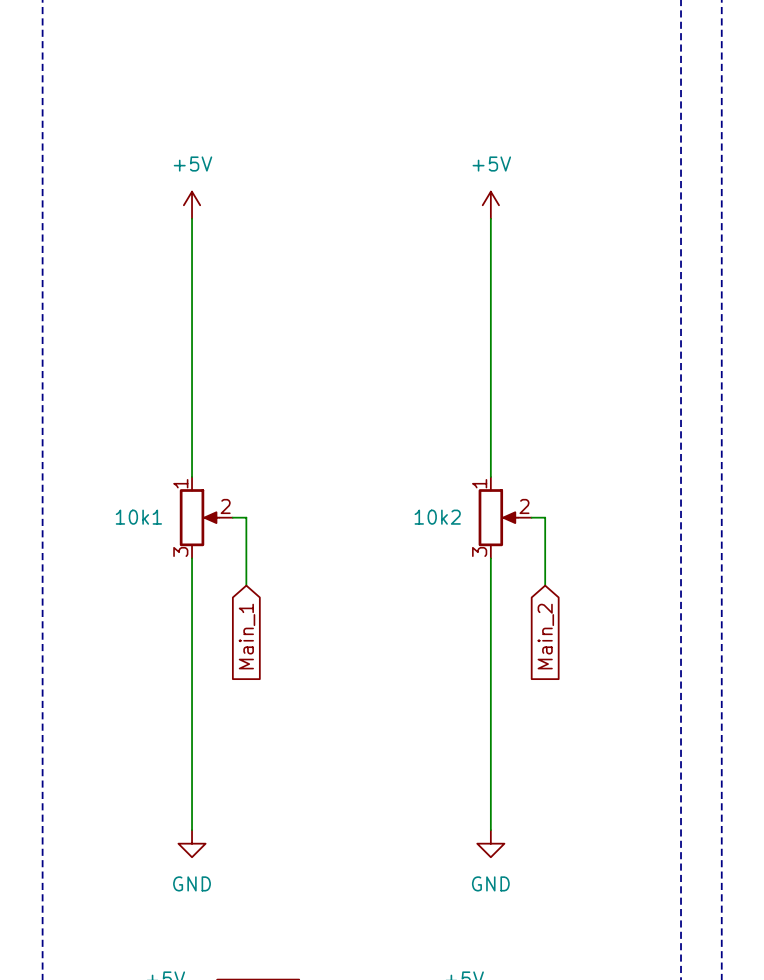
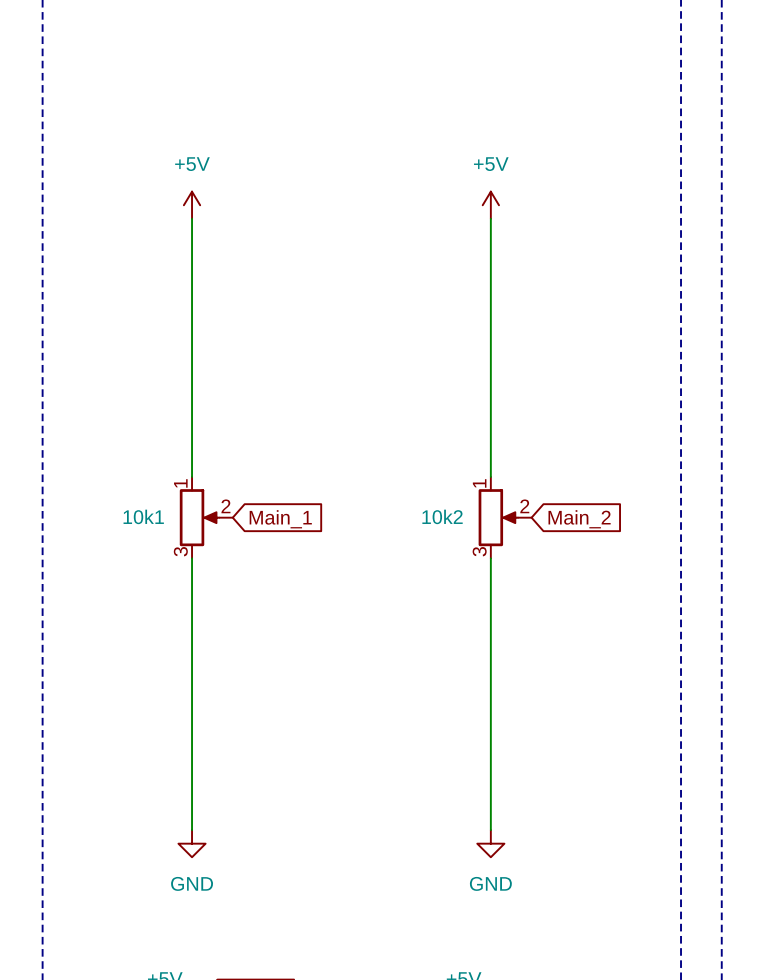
wire: (232, 517) (246, 517) (246, 585) -> none
wire: (531, 517) (545, 517) (545, 585) -> none
global label rotation: 0° (247, 636) -> 90° counterclockwise (280, 519)
global label position: Main_1 (247, 636) -> Main_1 (280, 519)
global label rotation: 0° (545, 636) -> 90° counterclockwise (579, 519)
global label position: Main_2 (545, 636) -> Main_2 (579, 519)

